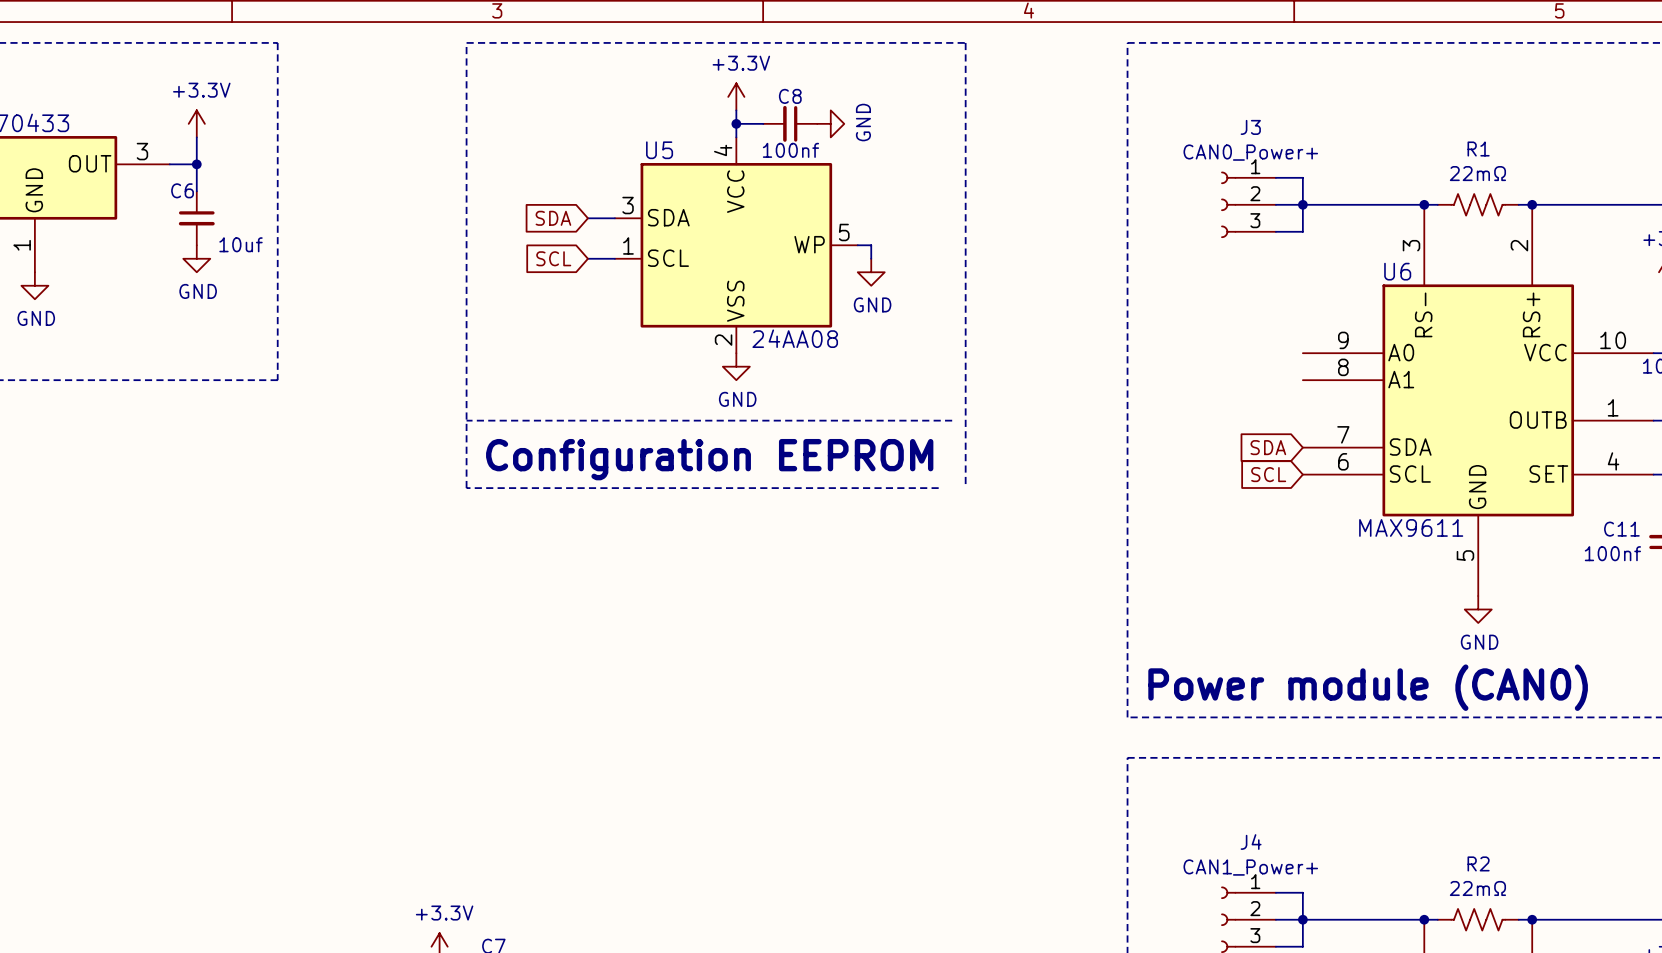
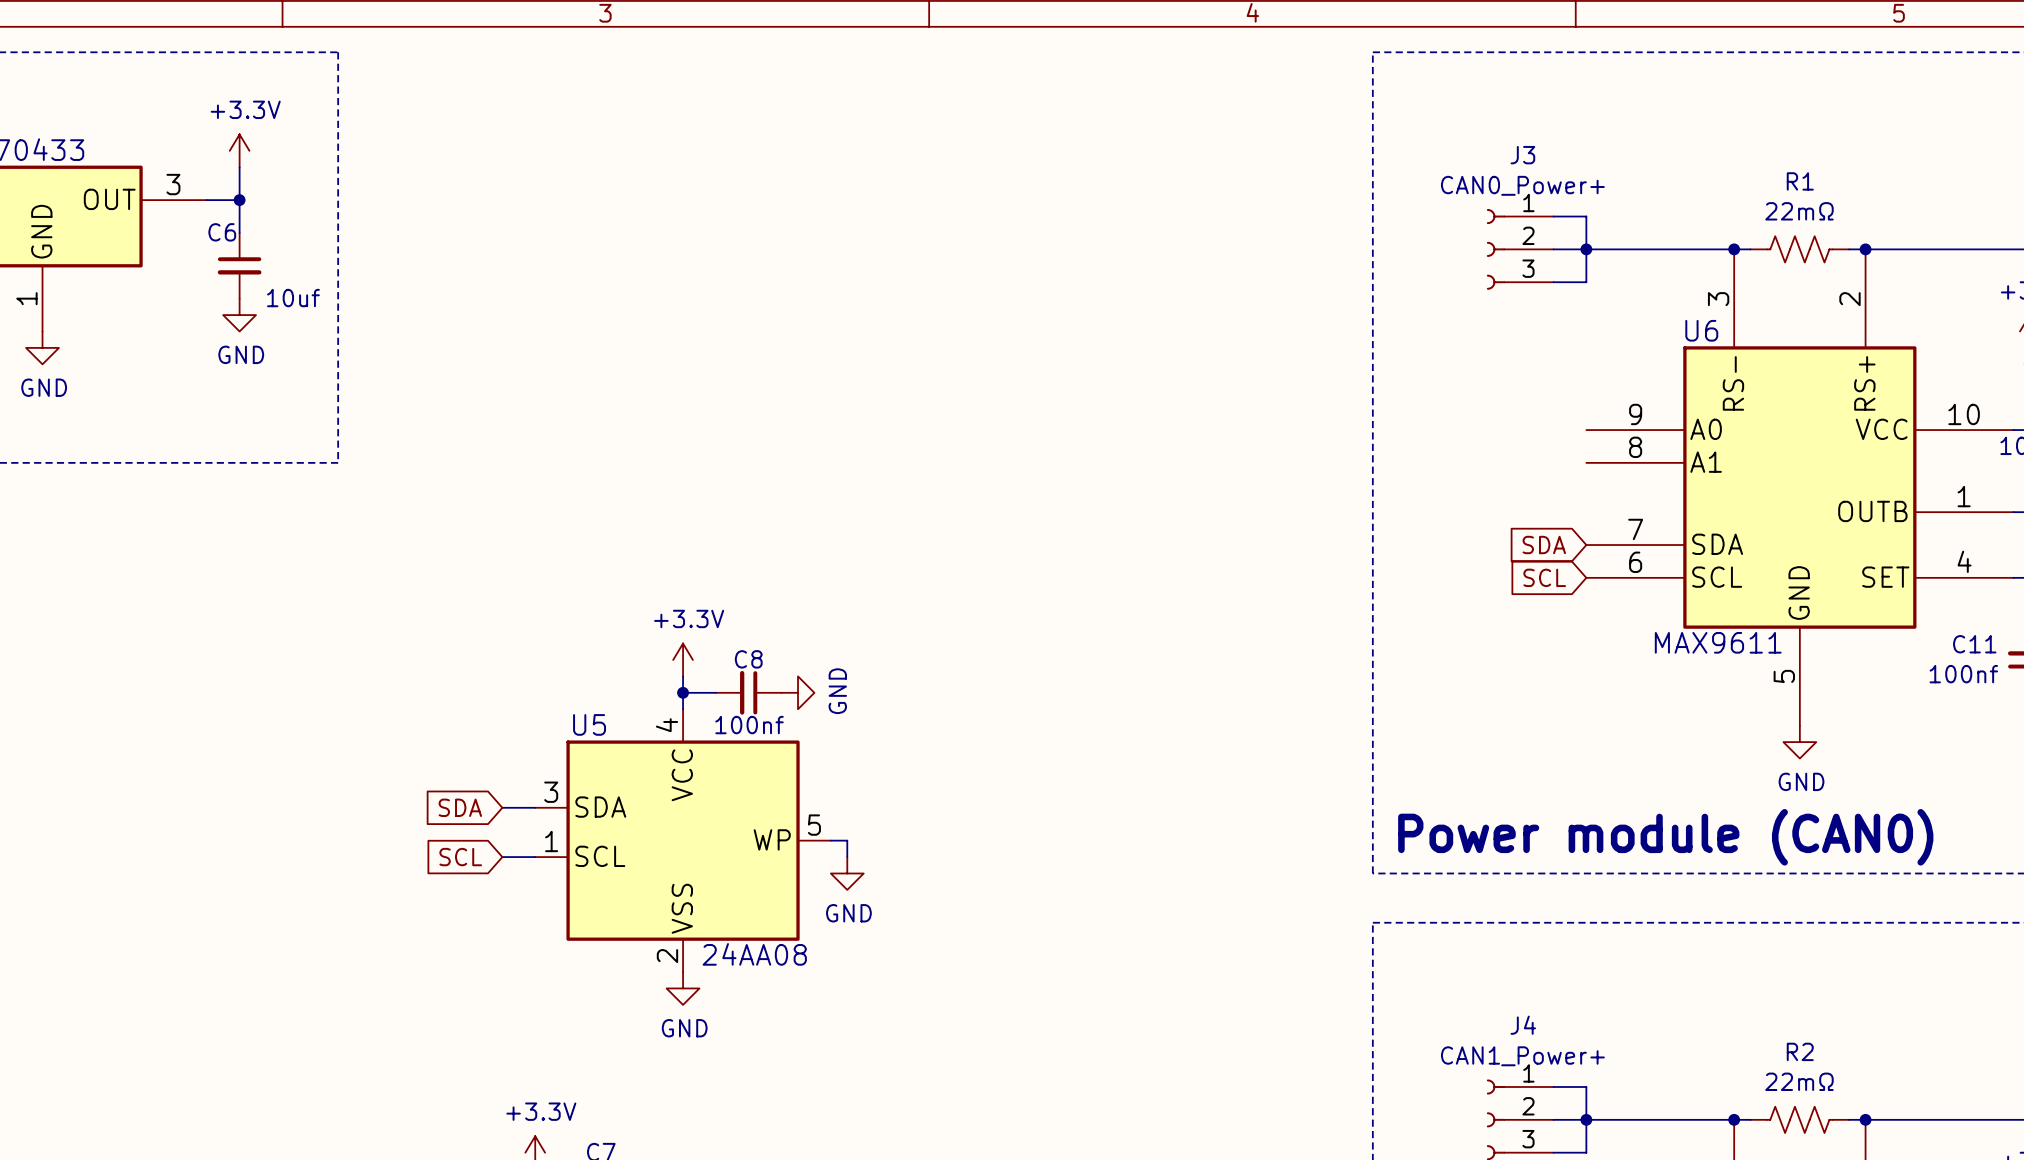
power symbol: +3.3V (736, 96) -> none
wire: (736, 110) (736, 137) -> none
wire: (736, 123) (763, 123) -> none
junction: (736, 123) -> none
C8 position: (790, 123) -> (748, 692)
power symbol: GND (830, 123) -> none
global label: SDA (553, 218) -> none
wire: (587, 218) (614, 218) -> none
U5 position: (736, 245) -> (683, 840)
wire: (857, 245) (871, 245) (871, 258) -> none
global label: SCL (553, 258) -> none
wire: (587, 258) (614, 258) -> none
power symbol: GND (871, 272) -> none
power symbol: GND (736, 366) -> none
line: (466, 420) (952, 420) -> none
text: Configuration EEPROM (709, 459) -> none
line: (938, 488) (466, 488) (466, 42) (965, 42) (965, 488) -> none
power symbol: none -> +3.3V (683, 659)
wire: none -> (683, 676) (683, 709)
wire: none -> (683, 692) (715, 692)
junction: none -> (683, 692)
power symbol: none -> GND (798, 692)
global label: none -> SDA (460, 807)
wire: none -> (502, 807) (535, 807)
wire: none -> (830, 840) (847, 840) (847, 857)
global label: none -> SCL (460, 857)
wire: none -> (502, 857) (535, 857)
power symbol: none -> GND (847, 873)
power symbol: none -> GND (683, 988)

